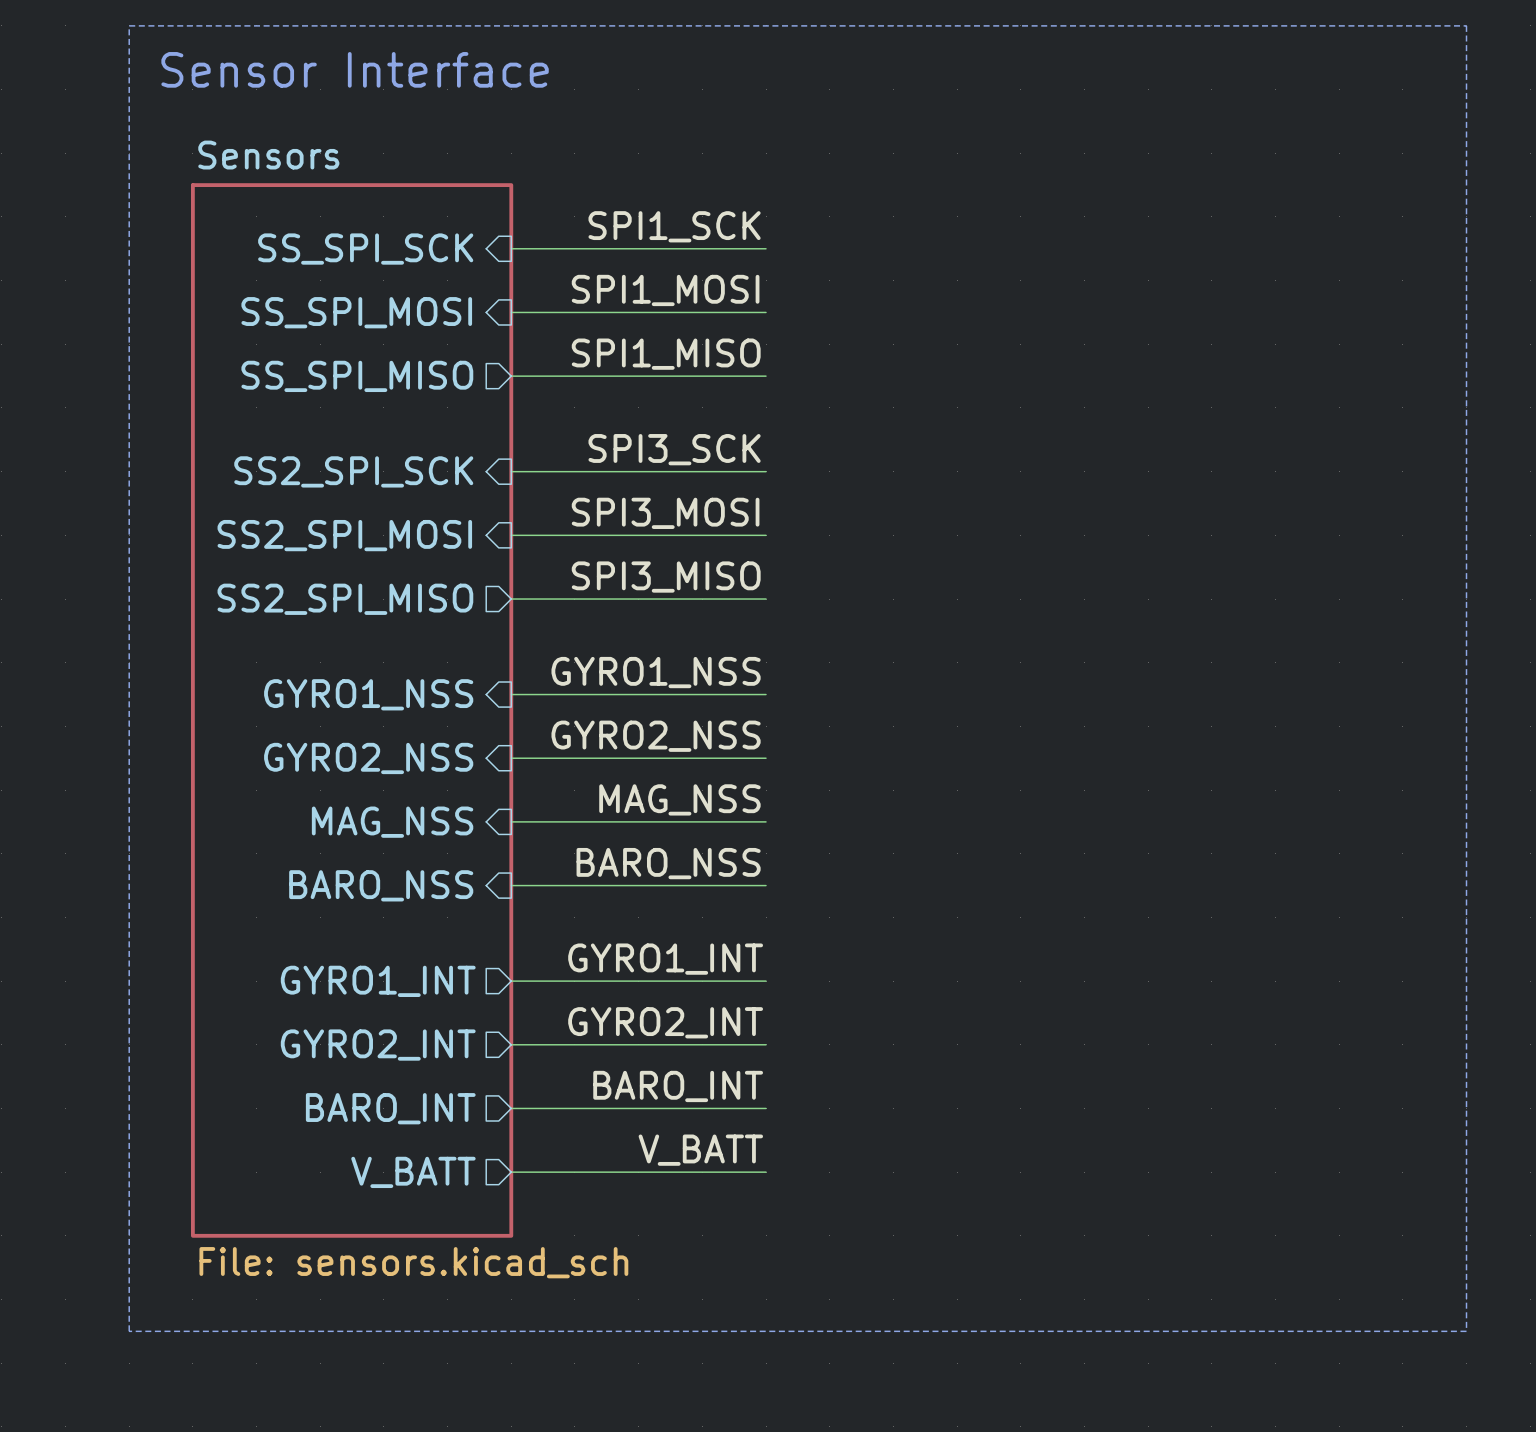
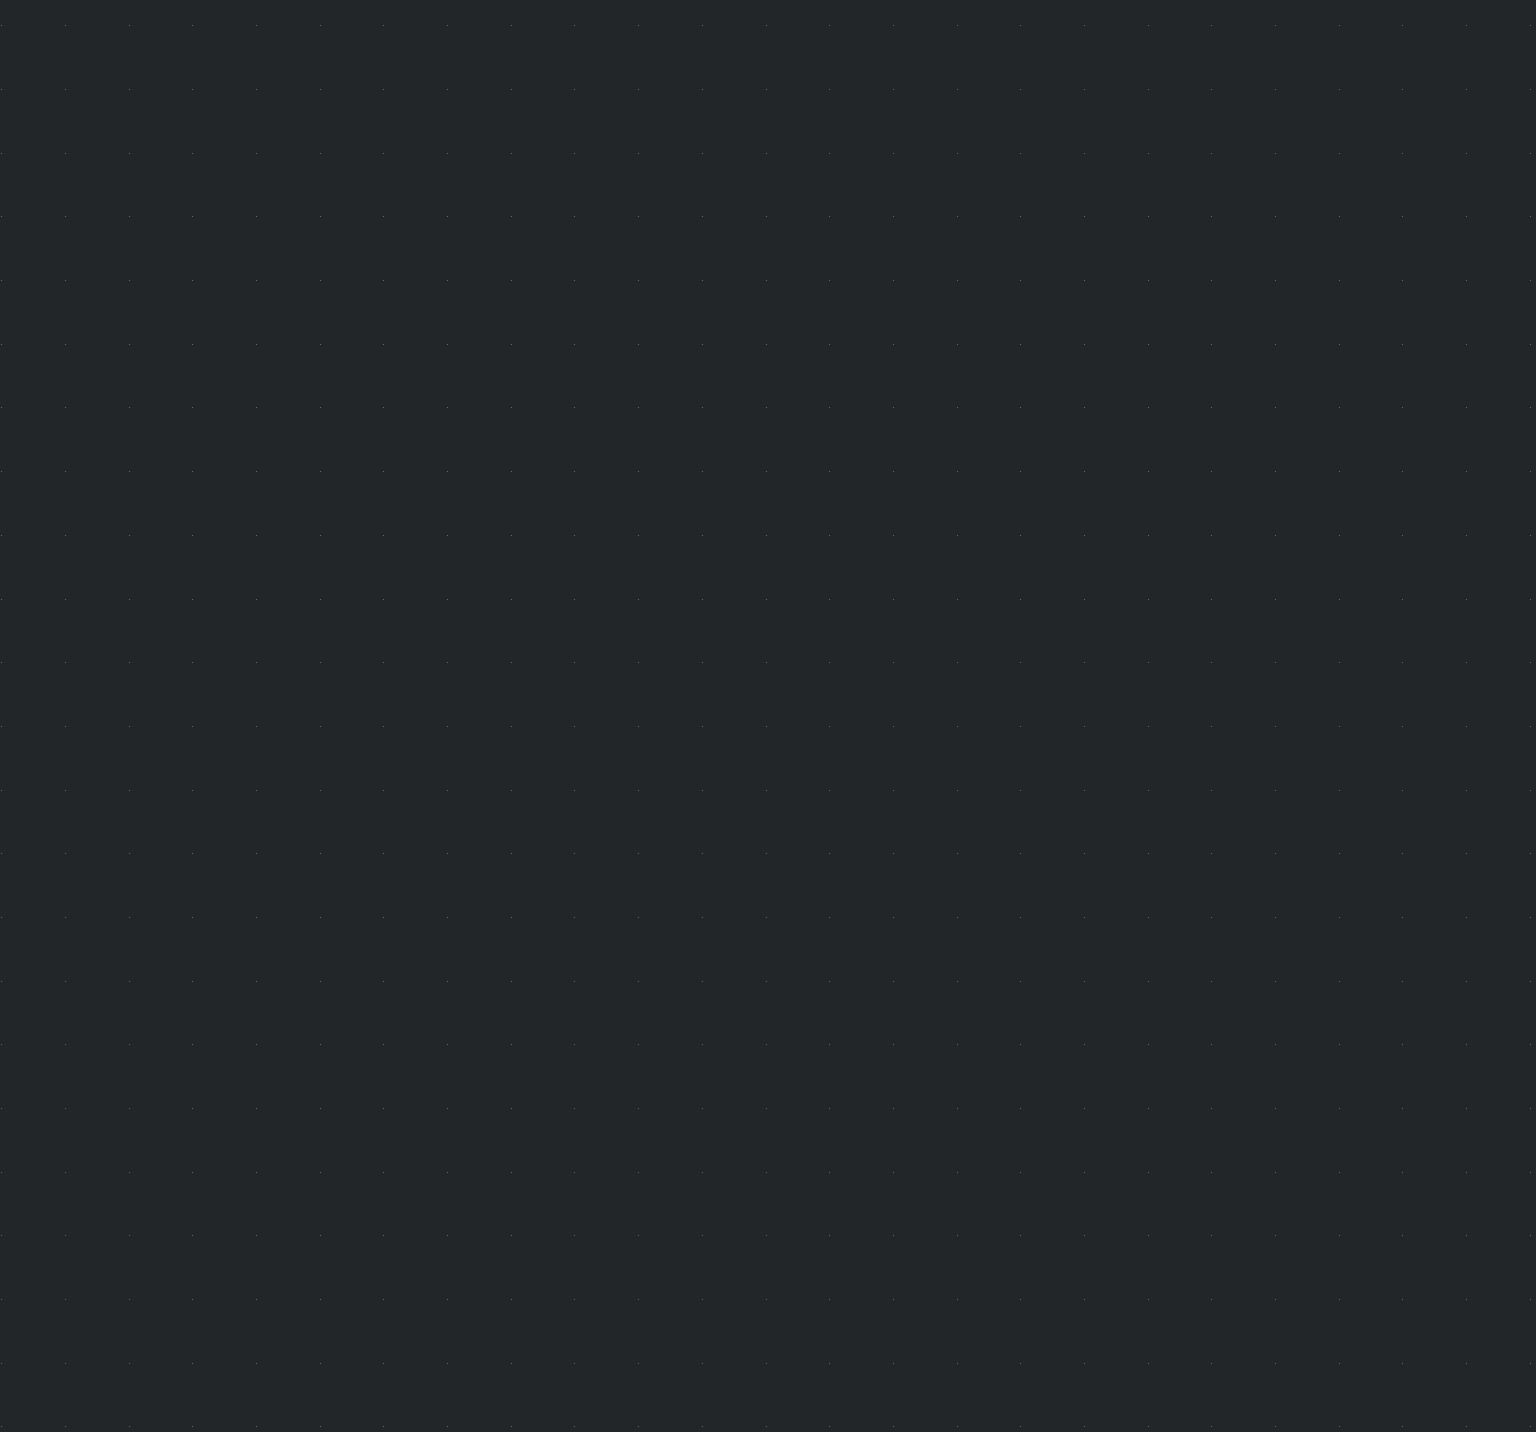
line: (129, 25) (1466, 25) (1466, 1331) (129, 1331) (129, 25) -> none
text: Sensor Interface (355, 69) -> none
label: SPI1_SCK (674, 226) -> none
wire: (511, 248) (766, 248) -> none
sheet pin: SS_SPI_SCK (365, 249) -> none
label: SPI1_MOSI (665, 290) -> none
sheet pin: SS_SPI_MOSI (356, 312) -> none
wire: (511, 312) (766, 312) -> none
label: SPI1_MISO (666, 354) -> none
sheet pin: SS_SPI_MISO (357, 376) -> none
wire: (511, 376) (766, 376) -> none
label: SPI3_SCK (674, 449) -> none
sheet pin: SS2_SPI_SCK (353, 471) -> none
wire: (511, 471) (766, 471) -> none
label: SPI3_MOSI (665, 513) -> none
sheet pin: SS2_SPI_MOSI (344, 535) -> none
wire: (511, 535) (766, 535) -> none
label: SPI3_MISO (666, 577) -> none
sheet pin: SS2_SPI_MISO (345, 599) -> none
wire: (511, 599) (766, 599) -> none
label: GYRO1_NSS (656, 672) -> none
sheet pin: GYRO1_NSS (368, 694) -> none
wire: (511, 694) (766, 694) -> none
sheet Sensors: File: sensors.kicad_sch (352, 710) -> none
label: GYRO2_NSS (656, 736) -> none
sheet pin: GYRO2_NSS (368, 758) -> none
wire: (511, 758) (766, 758) -> none
label: MAG_NSS (679, 799) -> none
wire: (511, 821) (766, 821) -> none
sheet pin: MAG_NSS (392, 822) -> none
label: BARO_NSS (668, 863) -> none
sheet pin: BARO_NSS (381, 885) -> none
wire: (511, 885) (766, 885) -> none
label: GYRO1_INT (665, 959) -> none
sheet pin: GYRO1_INT (378, 981) -> none
wire: (511, 981) (766, 981) -> none
label: GYRO2_INT (665, 1022) -> none
wire: (511, 1044) (766, 1044) -> none
sheet pin: GYRO2_INT (378, 1045) -> none
label: BARO_INT (678, 1086) -> none
sheet pin: BARO_INT (390, 1108) -> none
wire: (511, 1108) (766, 1108) -> none
label: V_BATT (700, 1150) -> none
sheet pin: V_BATT (413, 1172) -> none
wire: (511, 1172) (766, 1172) -> none

